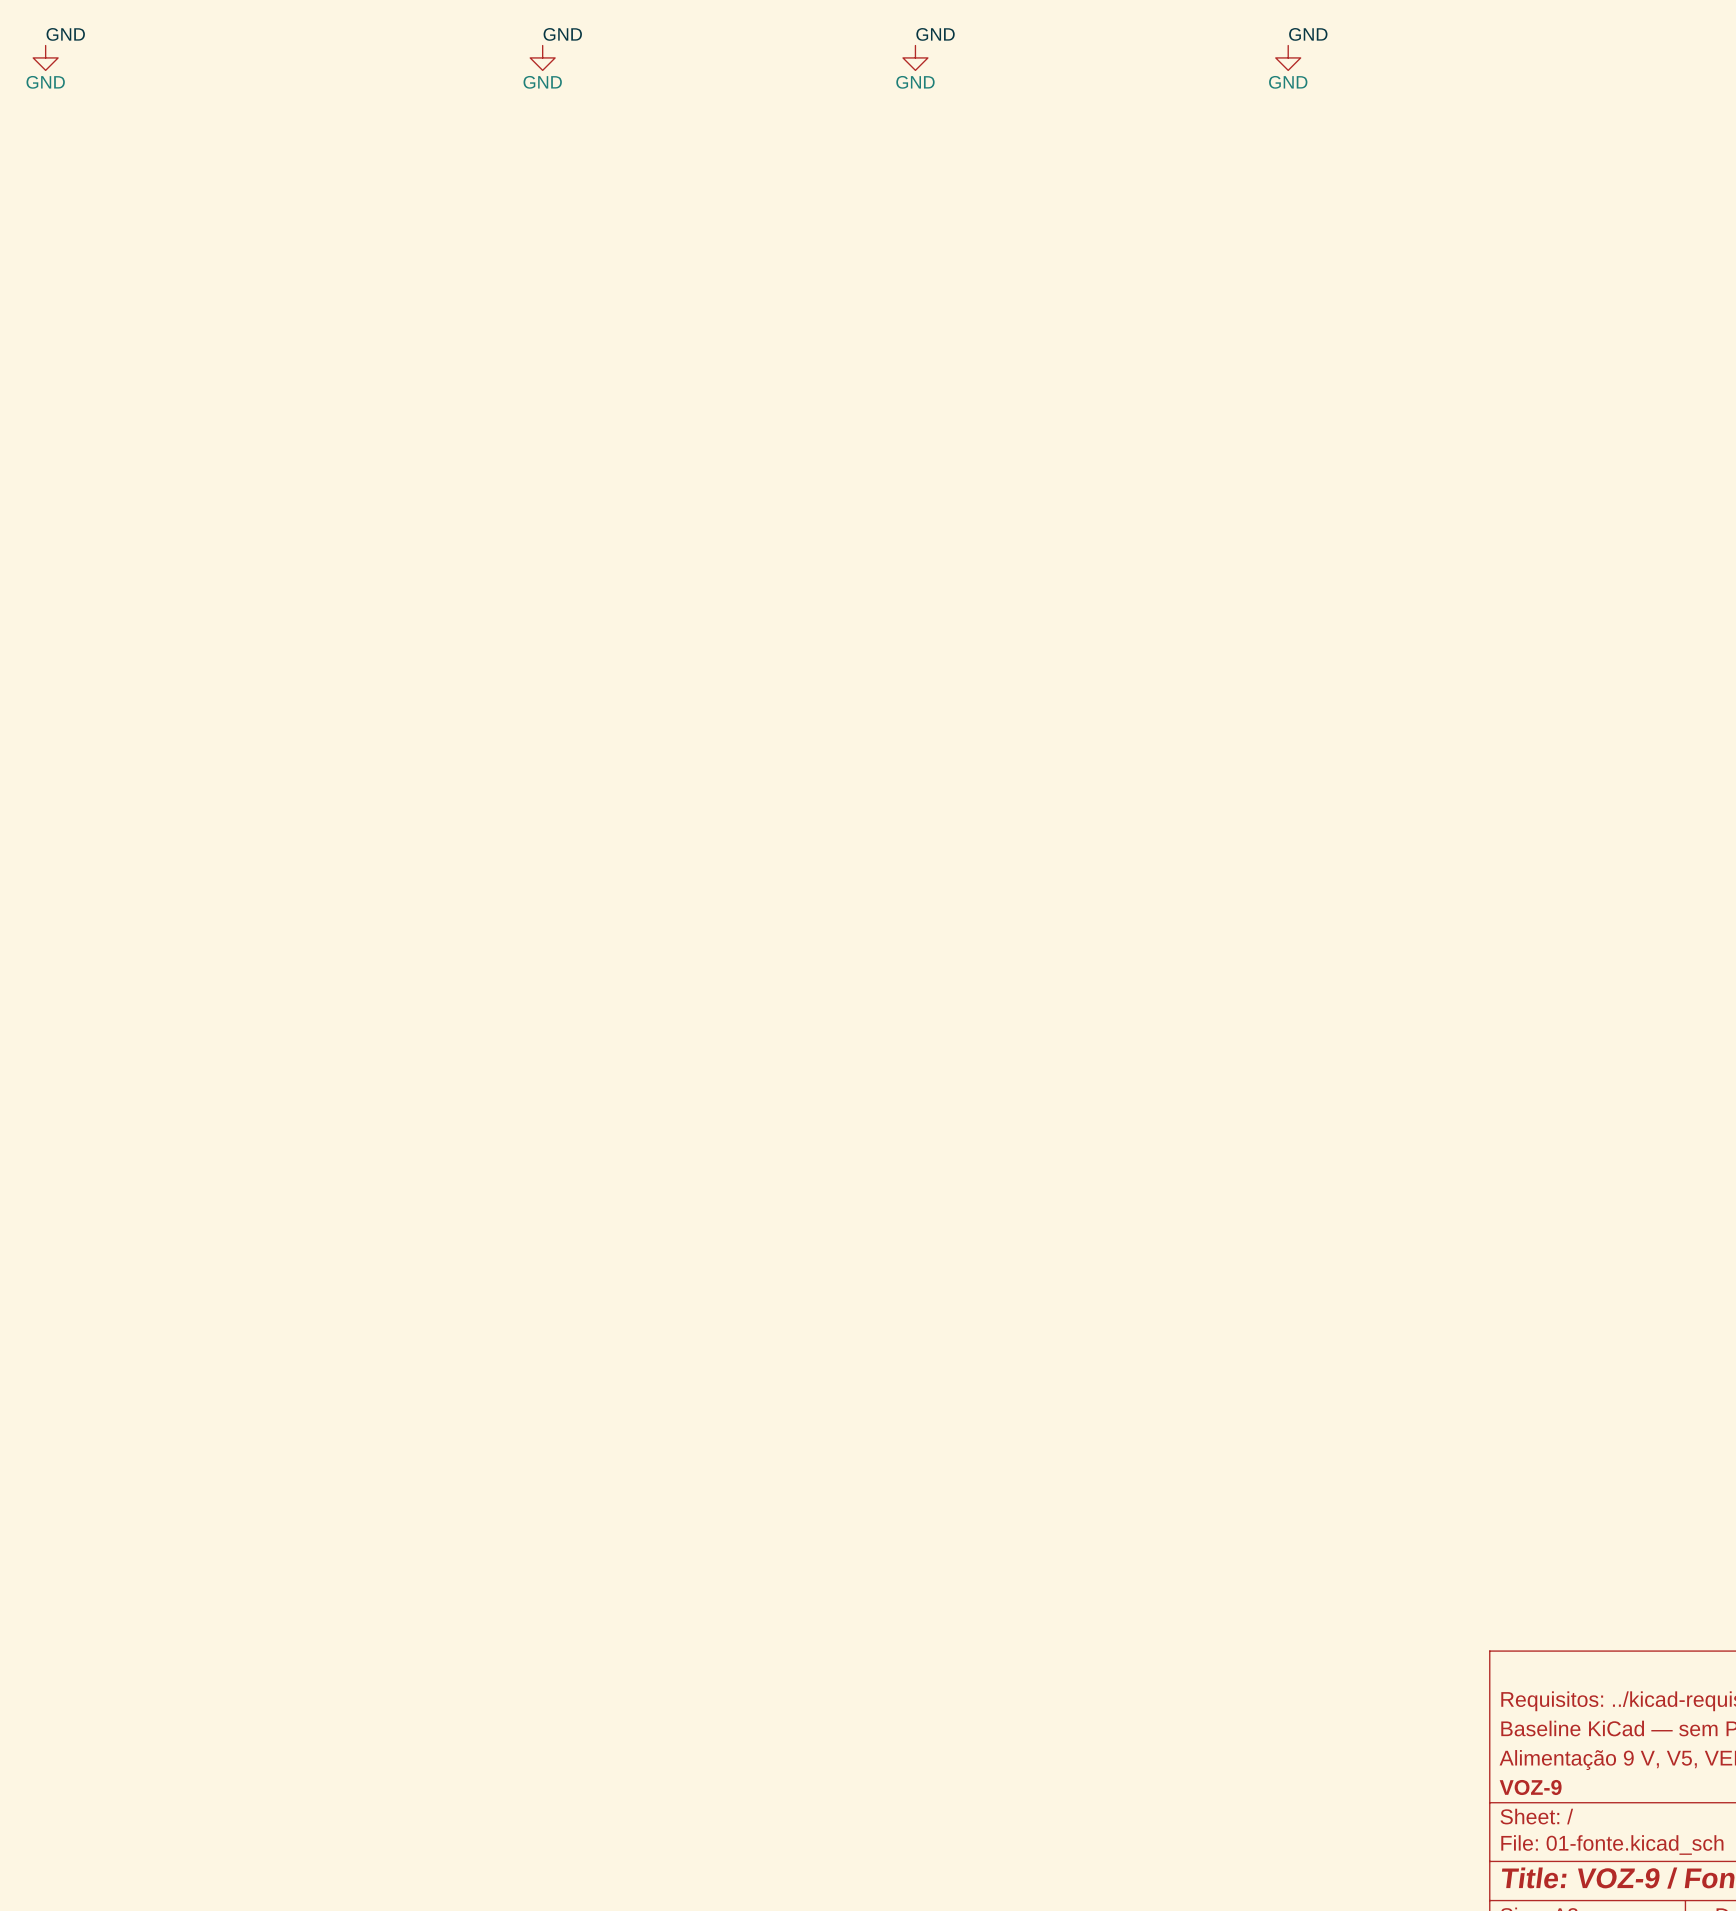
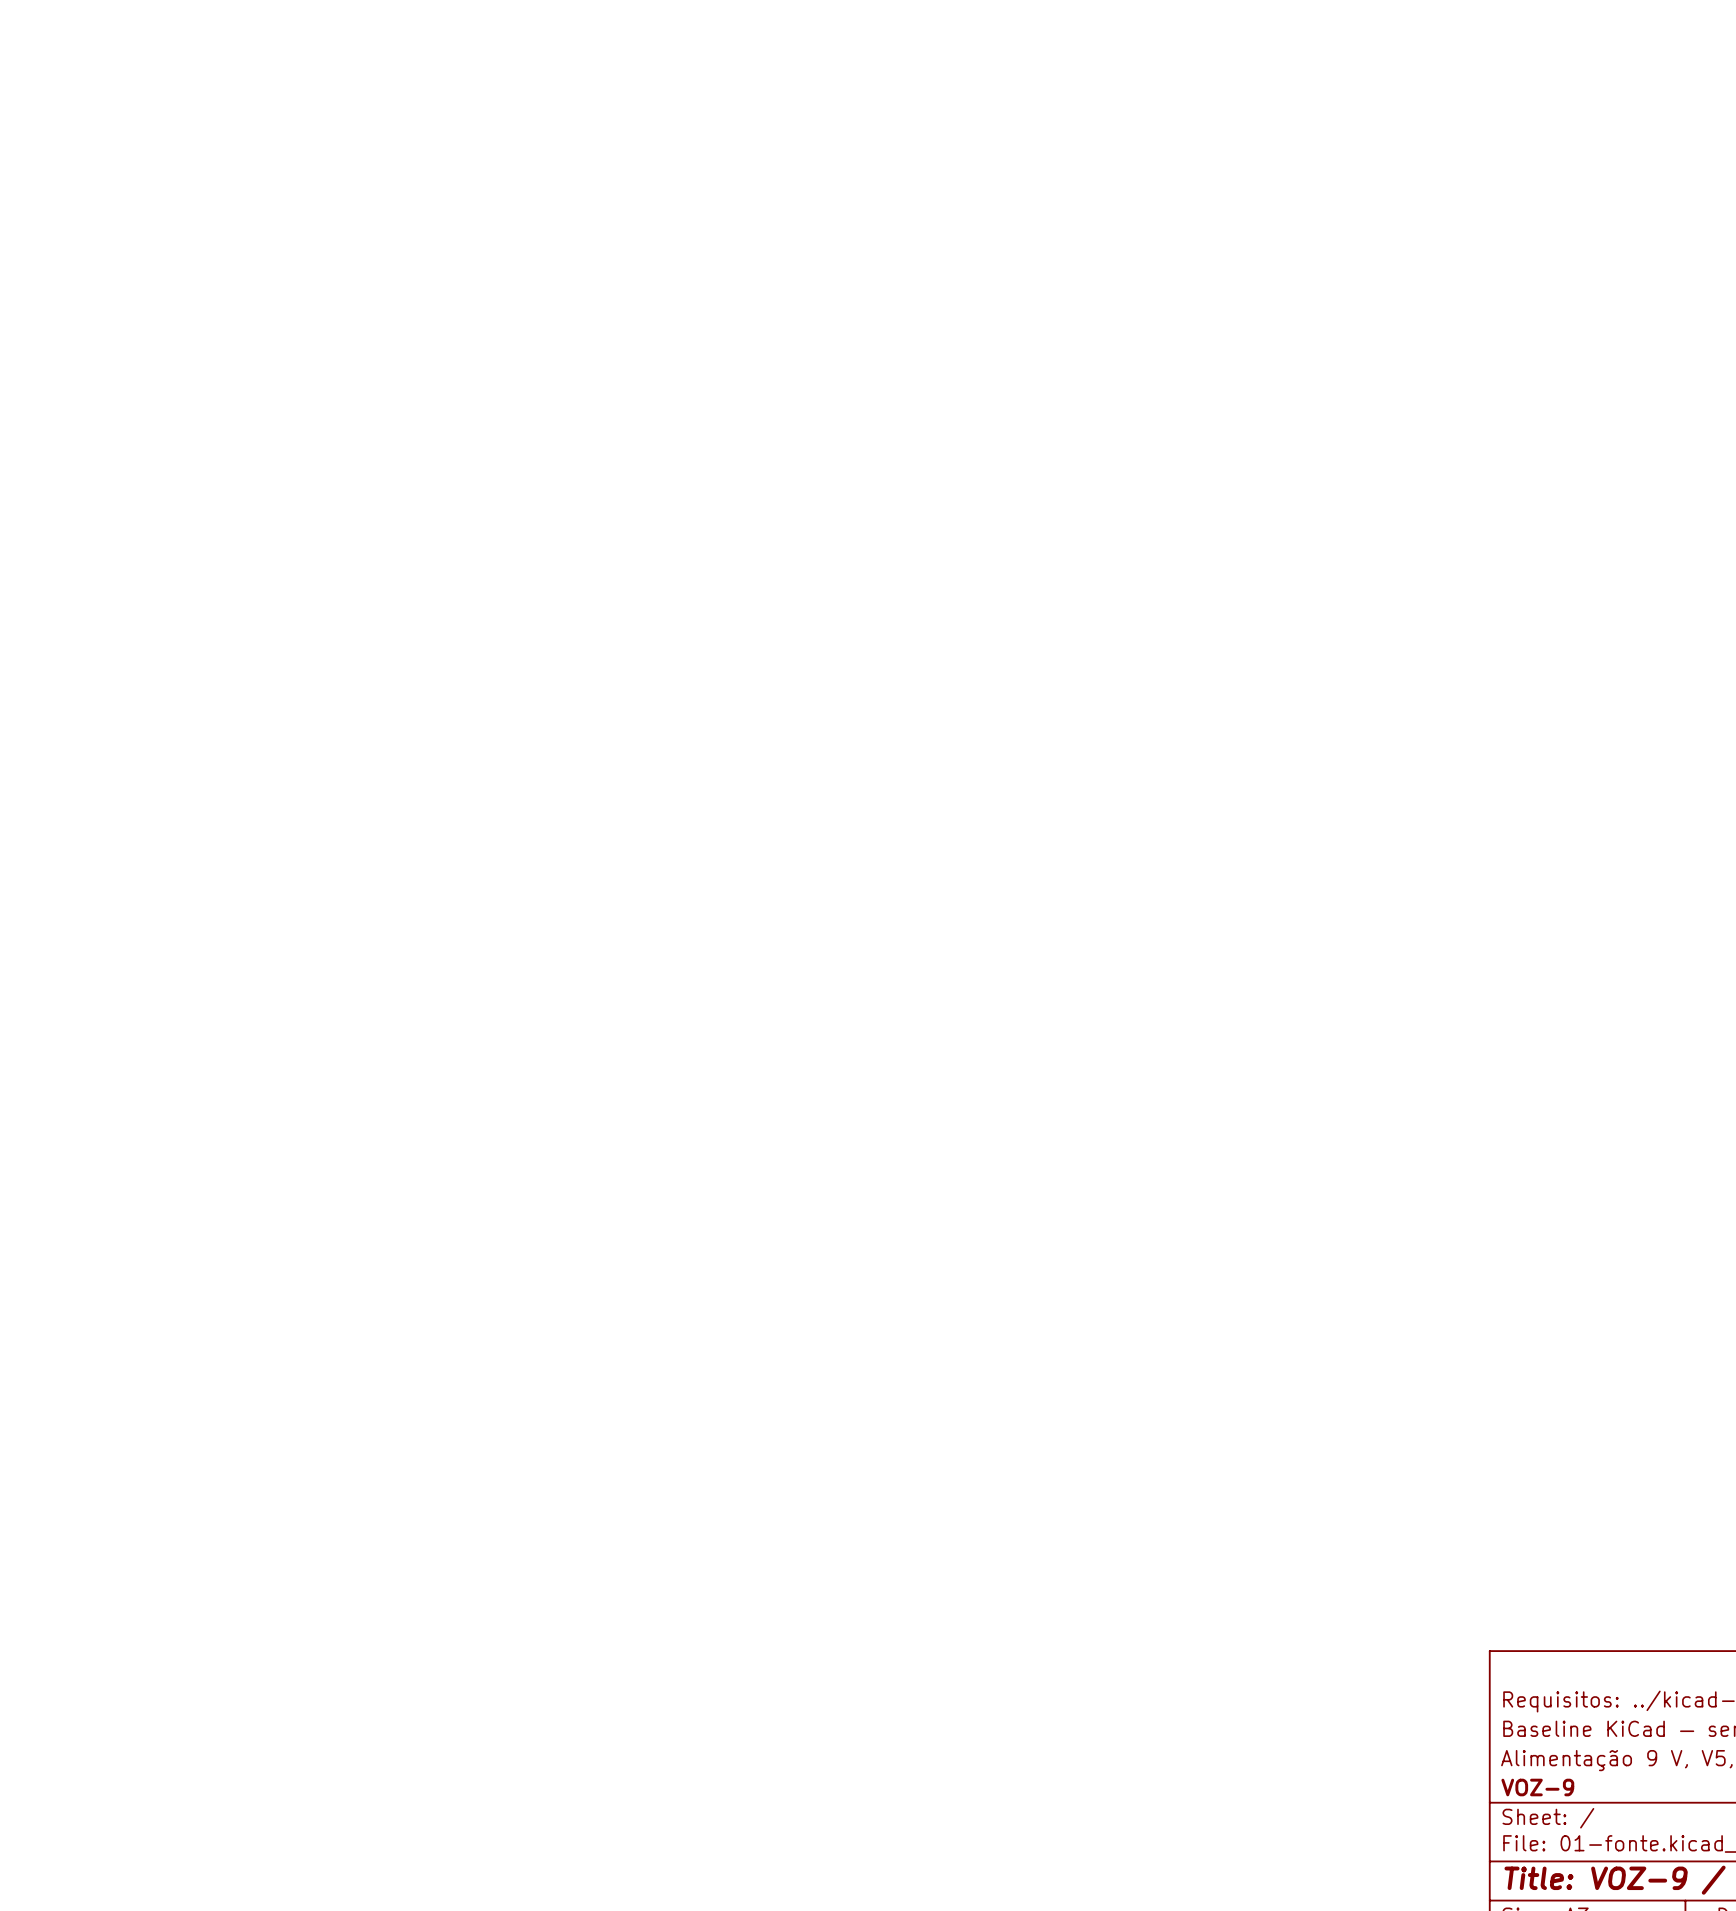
label: GND (65, 34) -> none
label: GND (562, 34) -> none
label: GND (935, 34) -> none
label: GND (1308, 34) -> none
power symbol: GND (45, 57) -> none
power symbol: GND (542, 57) -> none
power symbol: GND (915, 57) -> none
power symbol: GND (1288, 57) -> none

